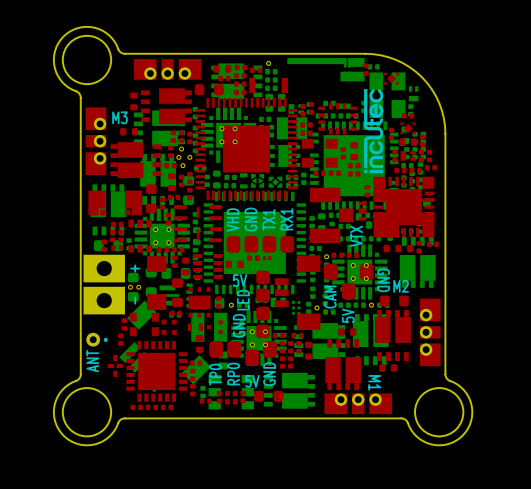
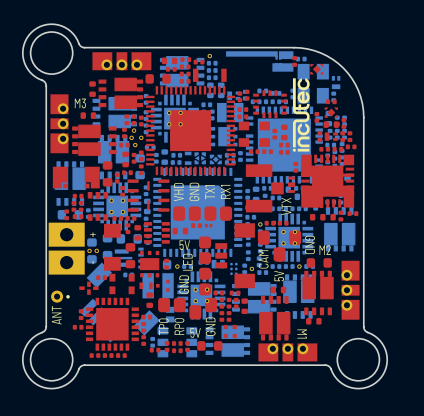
part footprint: [129, 312, 159, 337] -> [96, 275, 107, 281]
part: (176, 313) -> none
part footprint: [161, 319, 177, 335] -> [109, 273, 135, 295]
part: (124, 324) -> none
part: (120, 339) -> none
part: none -> (81, 314)
part rotation: 0° (115, 365) -> 90° clockwise (88, 288)
part position: (115, 365) -> (88, 288)
part: none -> (78, 327)
part: none -> (230, 331)

